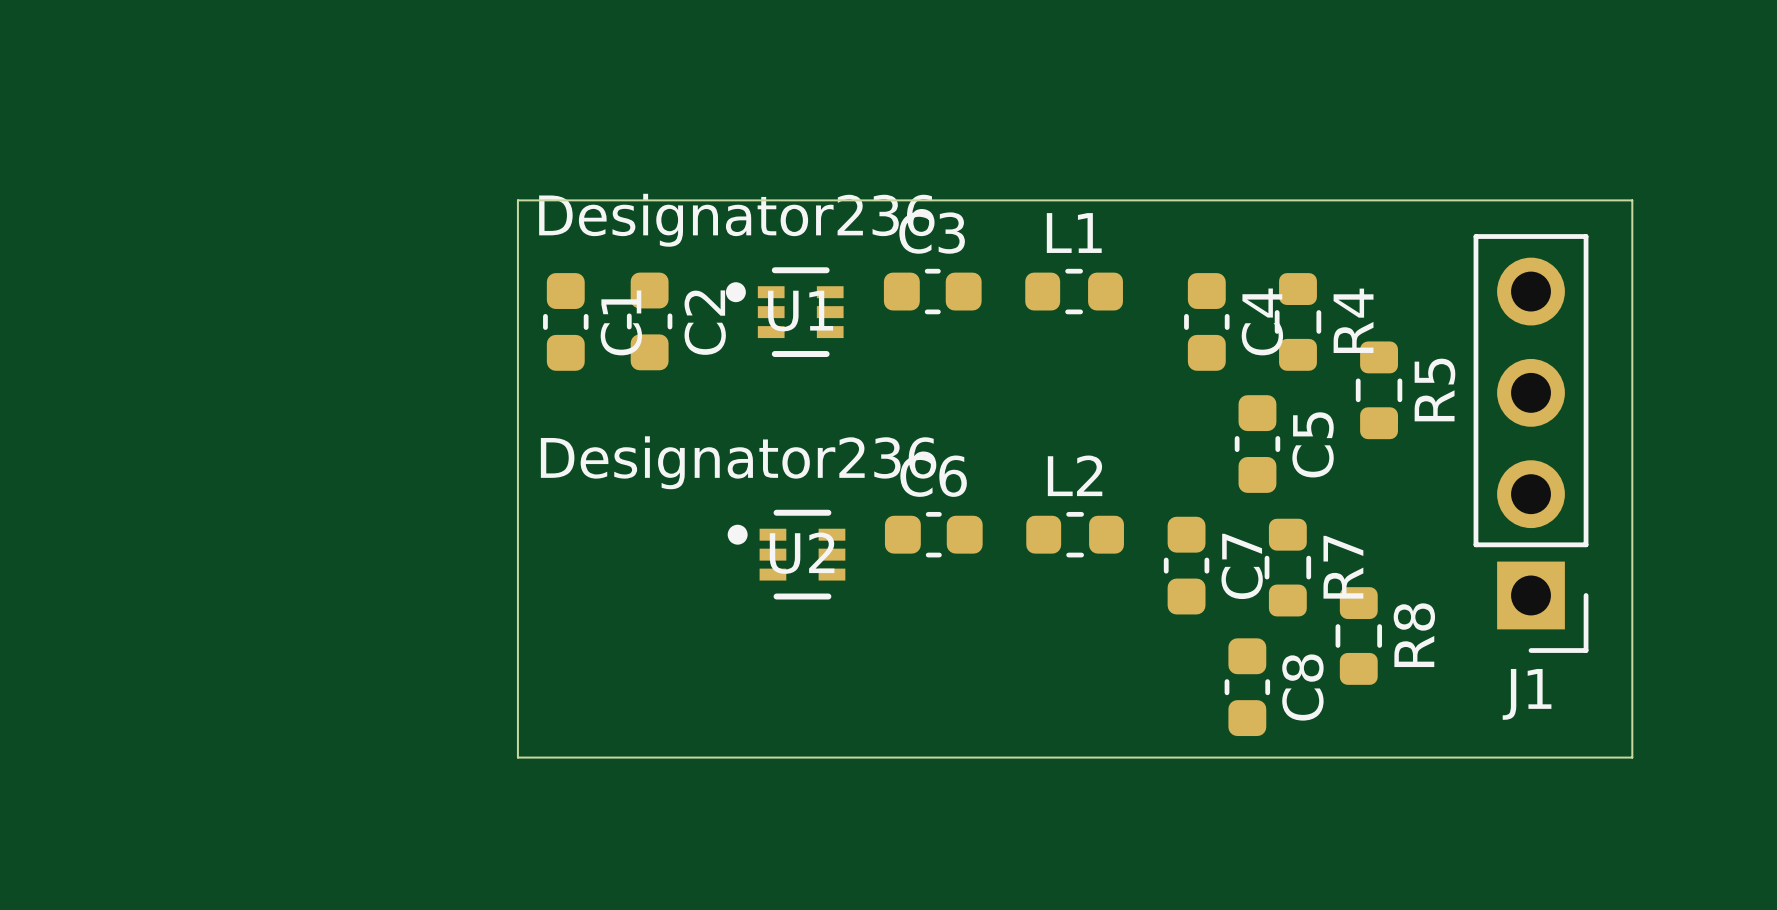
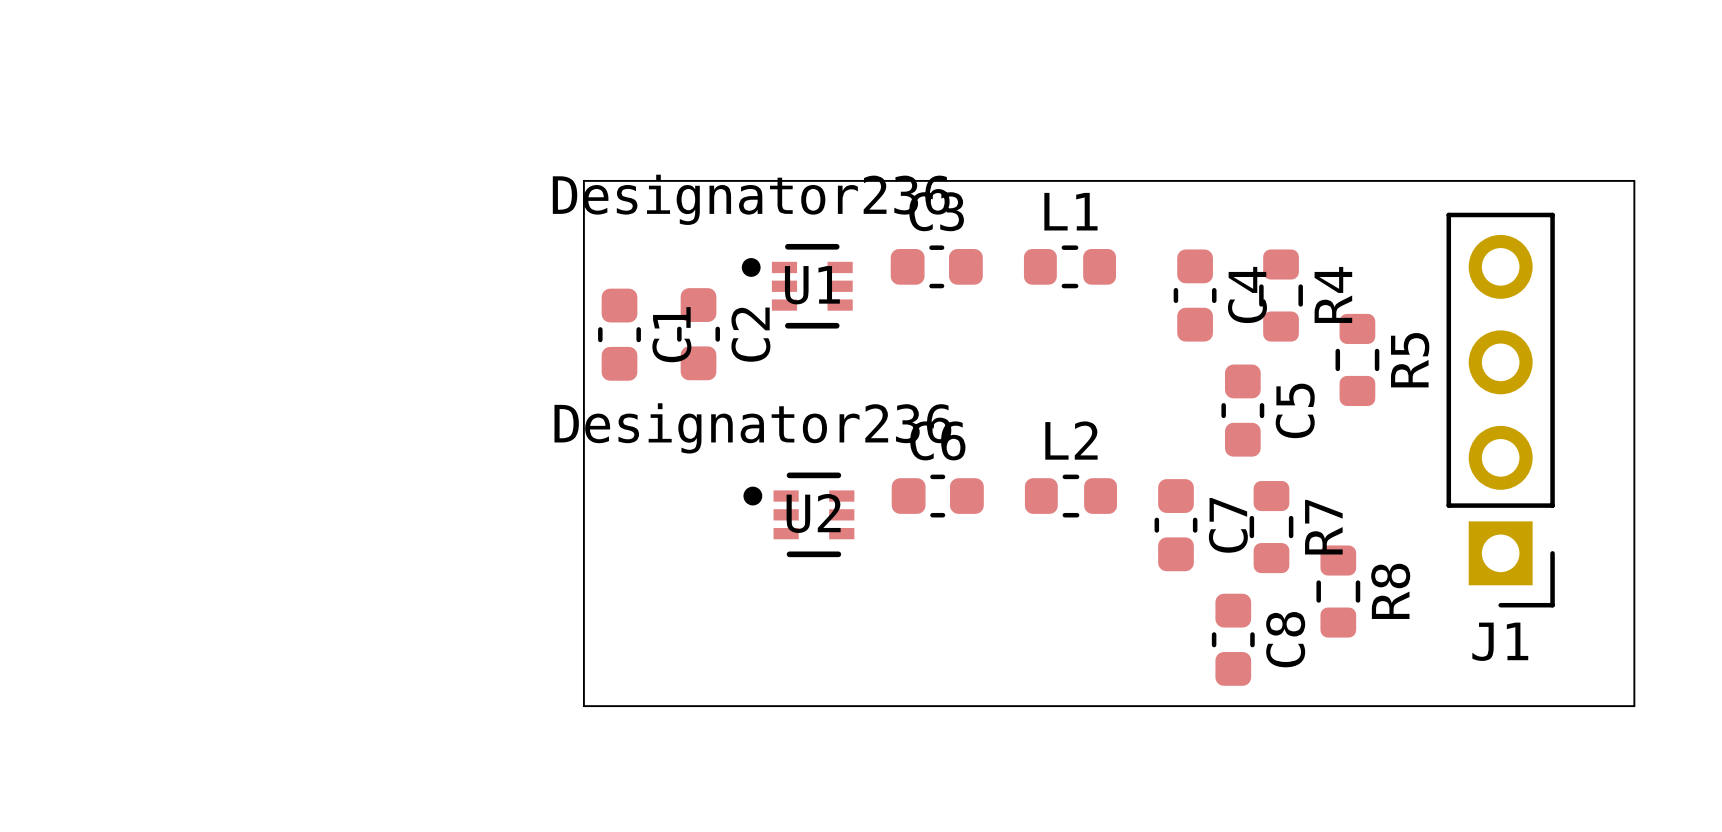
board edge: (558, 200) (517, 200) (517, 757) (558, 757) -> (583, 180) (583, 706)
board edge: (1632, 200) (1632, 757) -> (1596, 180) (1634, 180) (1634, 706) (1596, 706)
C1 position: (565, 321) -> (619, 334)
C2 position: (649, 321) -> (698, 334)

